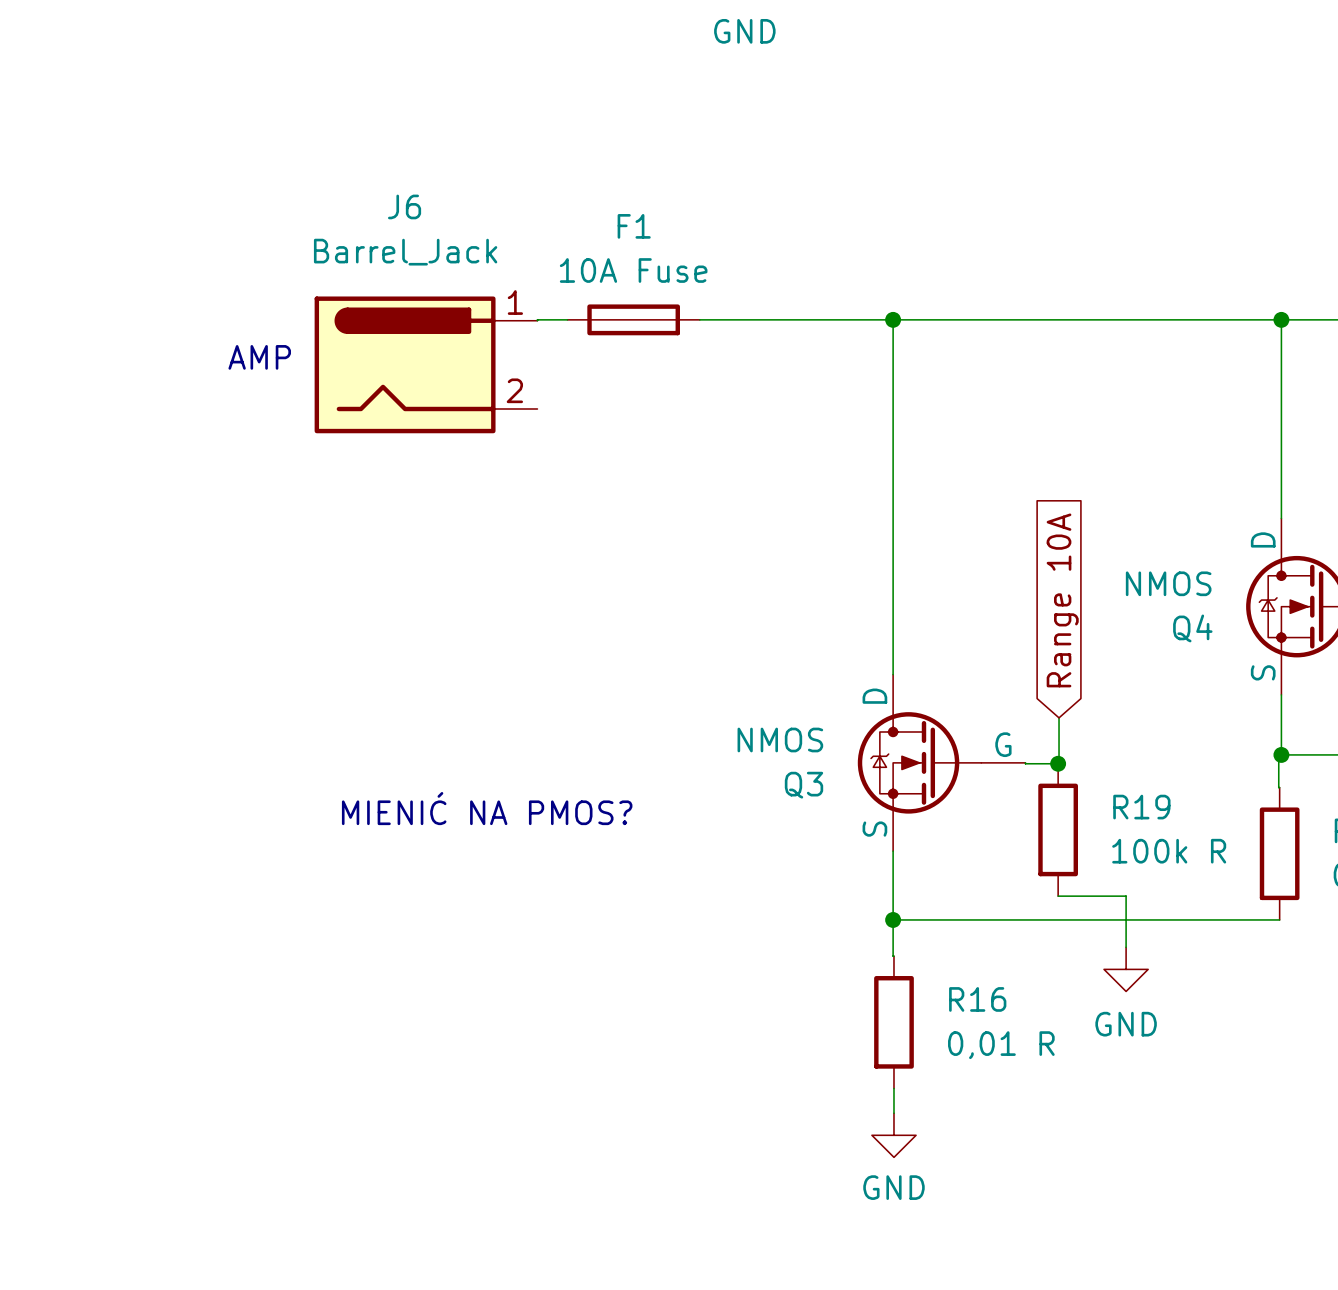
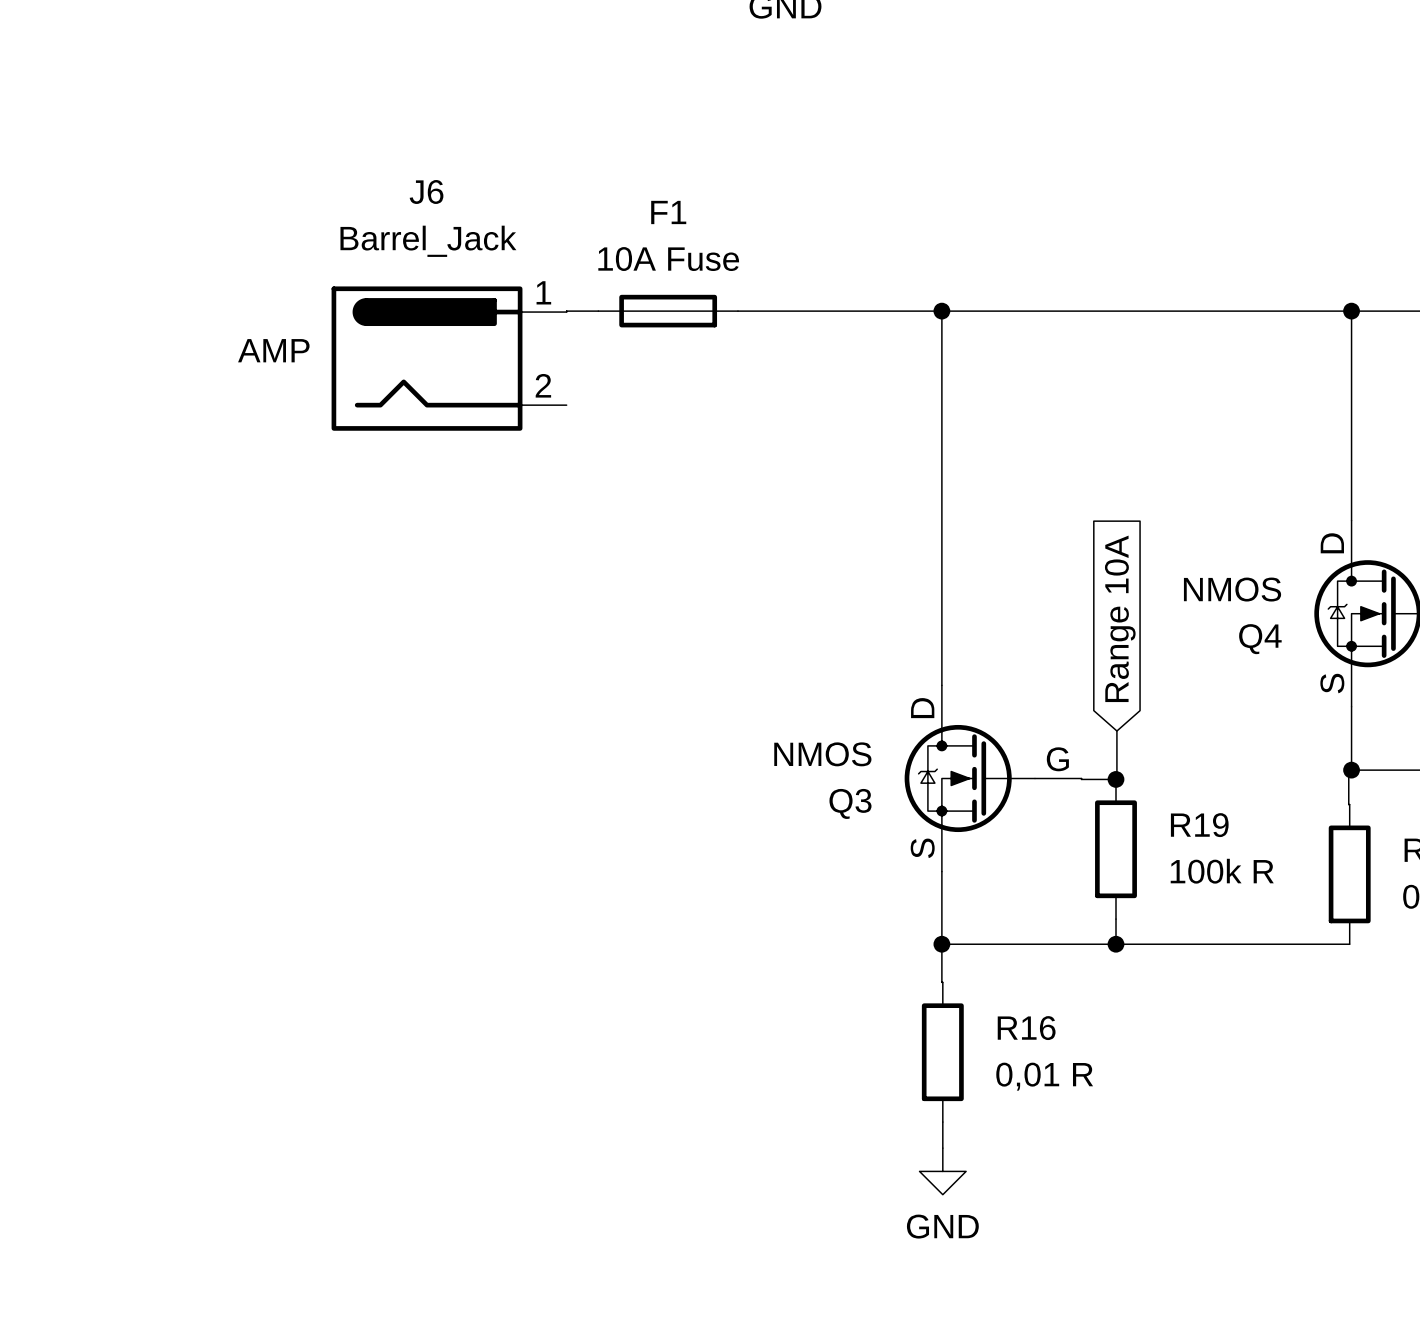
text: MIENIĆ NA PMOS? (487, 808) -> none
wire: (1058, 896) (1126, 896) (1126, 947) -> (1116, 919) (1116, 944)
junction: none -> (1116, 944)
power symbol: GND (1126, 969) -> none

